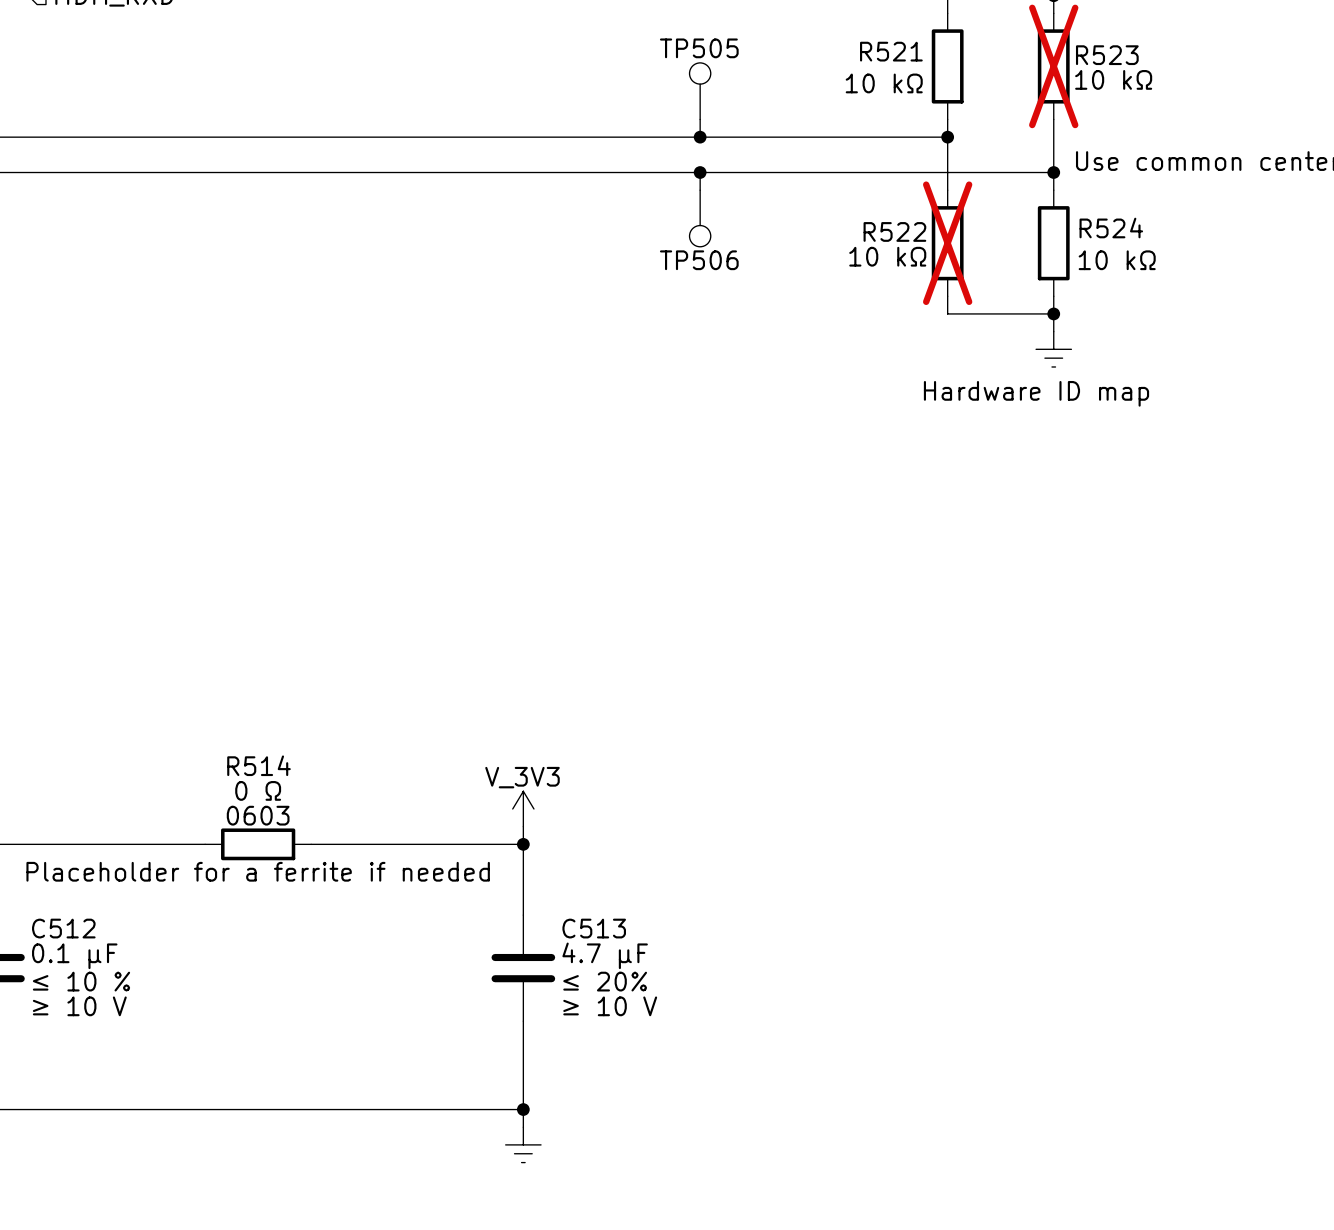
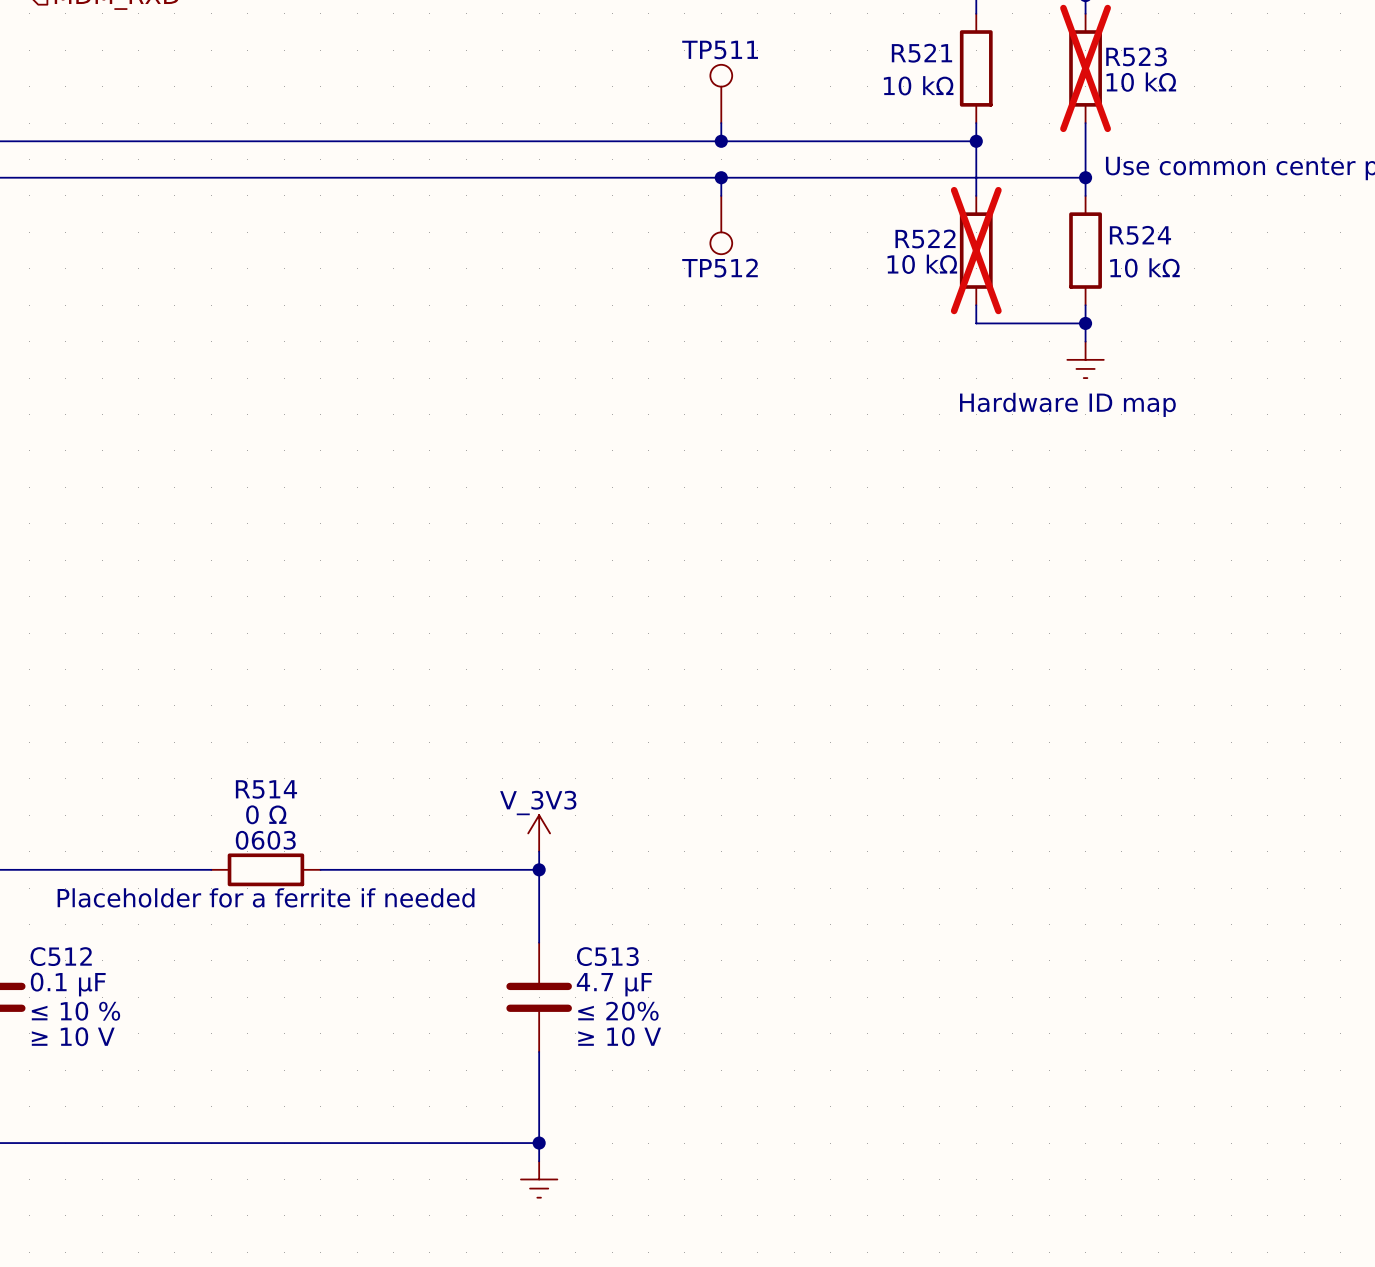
TP505 name: TP505 (699, 48) -> TP511 (720, 49)
TP506 name: TP506 (699, 260) -> TP512 (720, 268)

